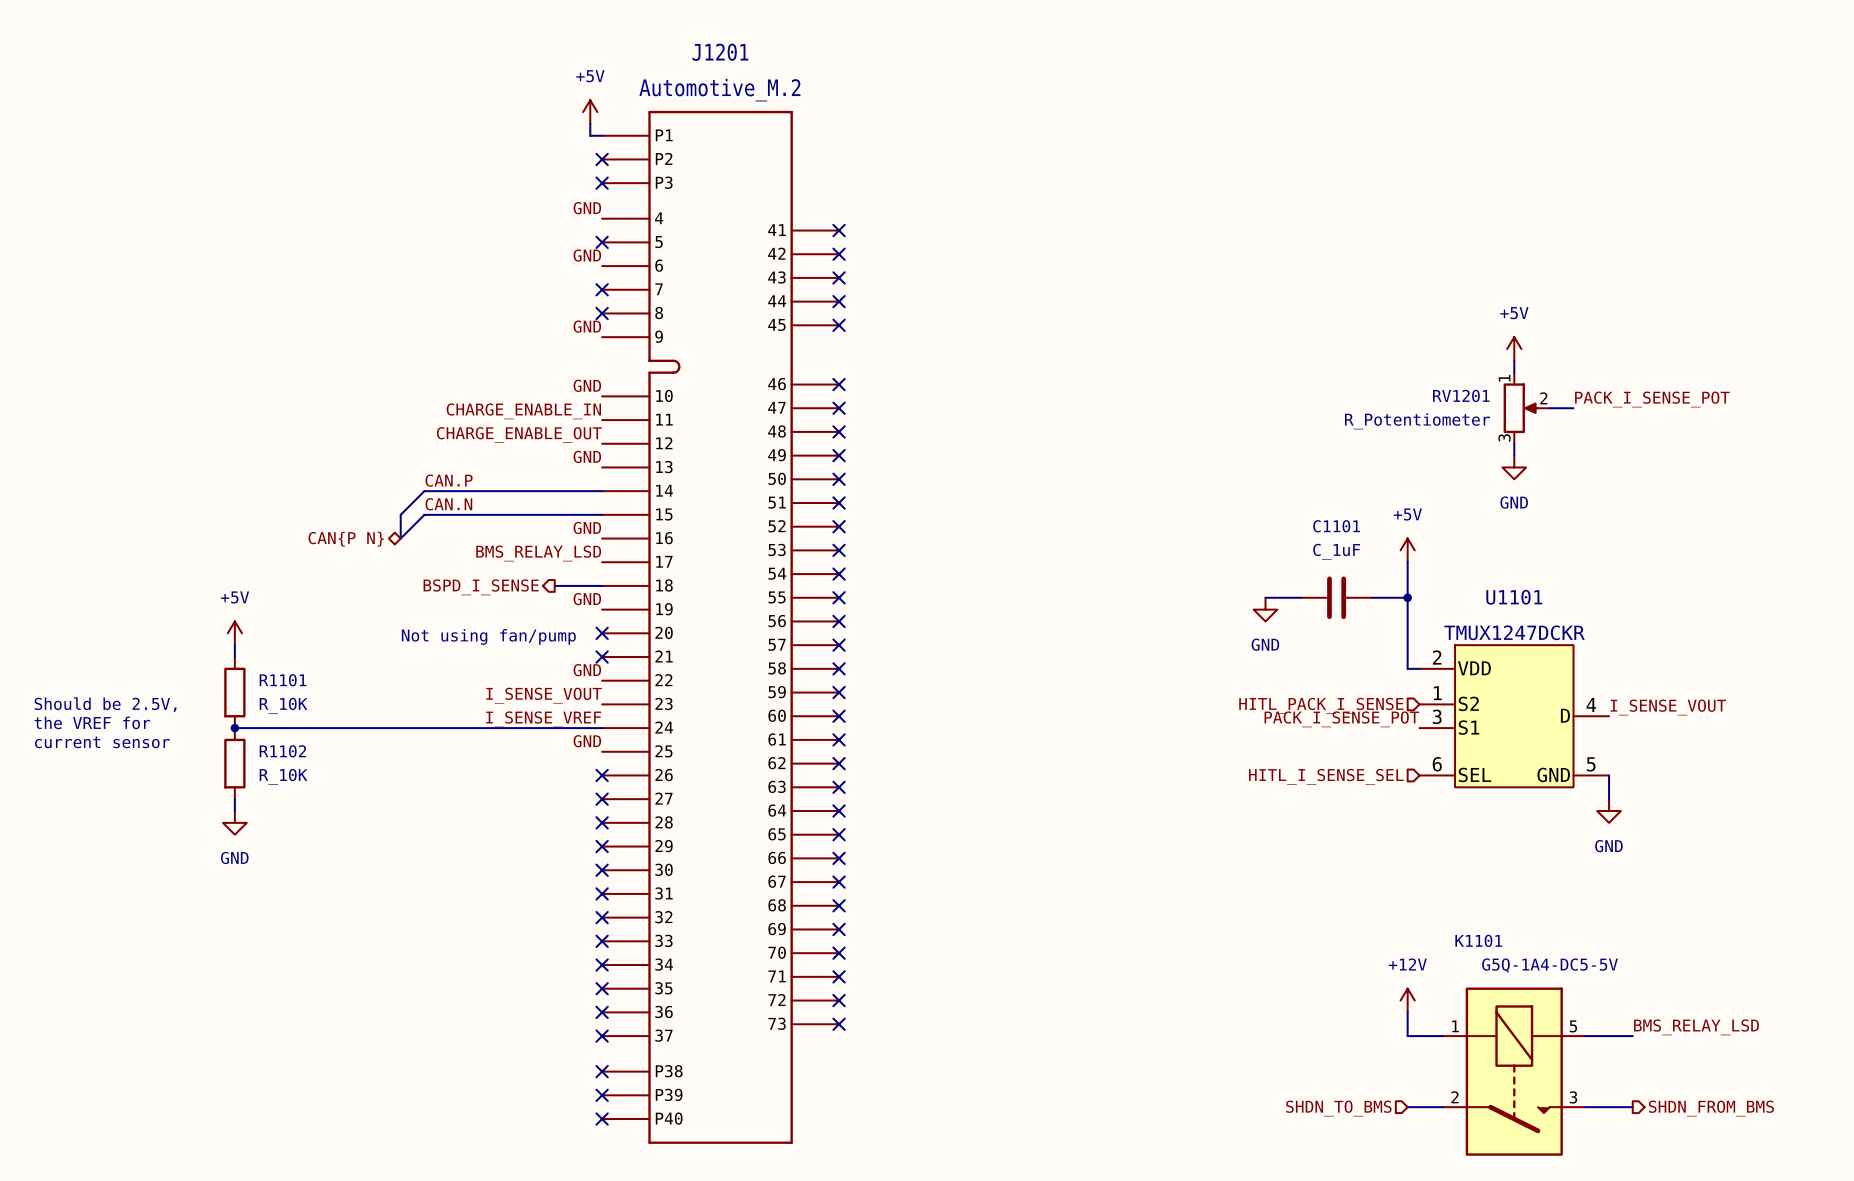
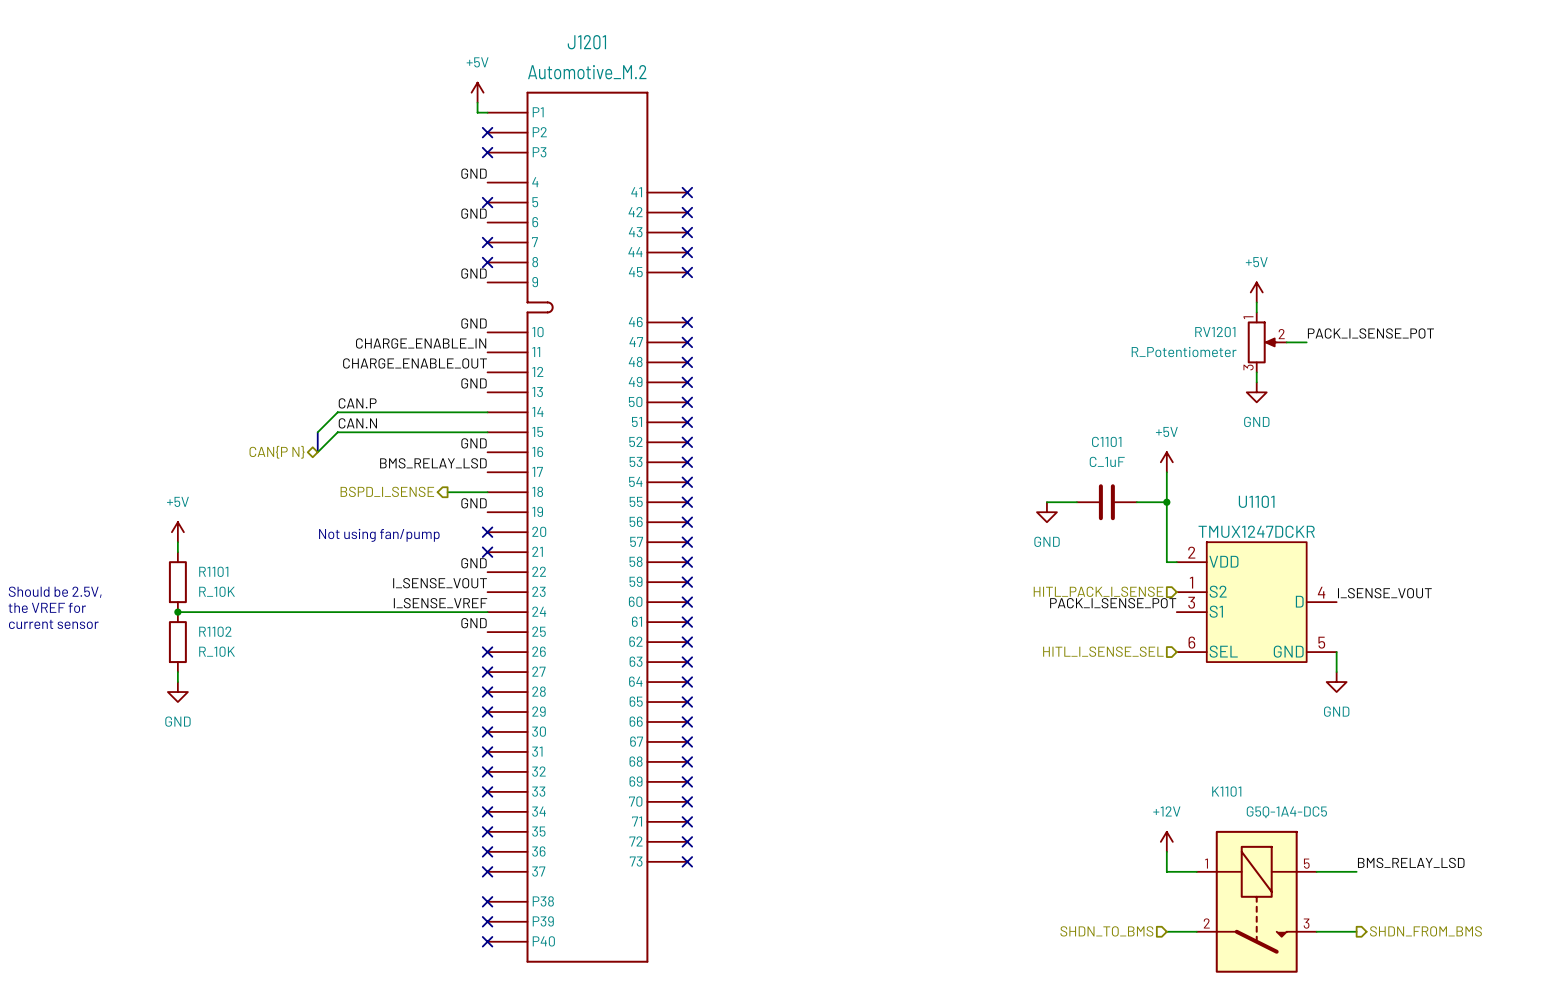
K1101 value: G5Q-1A4-DC5-5V (1550, 965) -> G5Q-1A4-DC5 (1286, 812)

